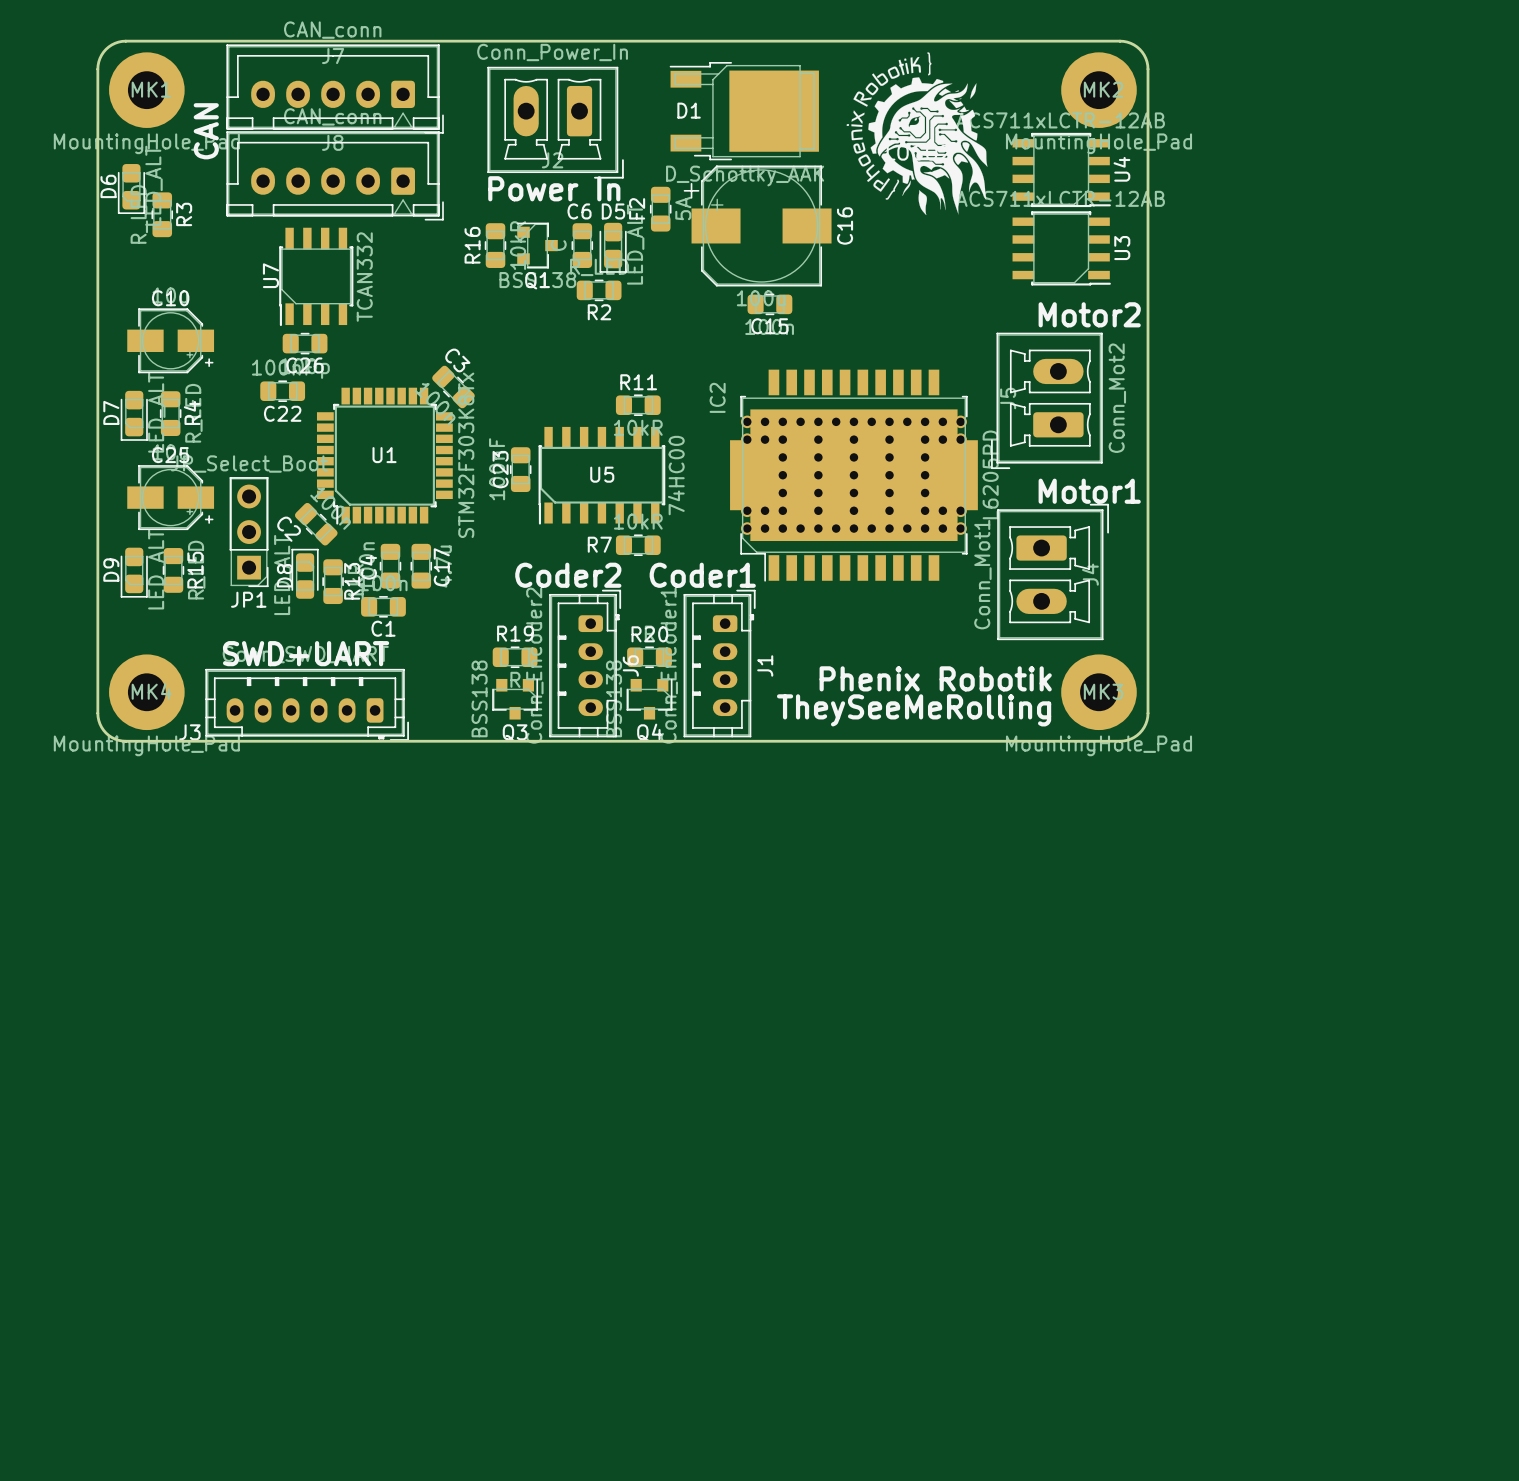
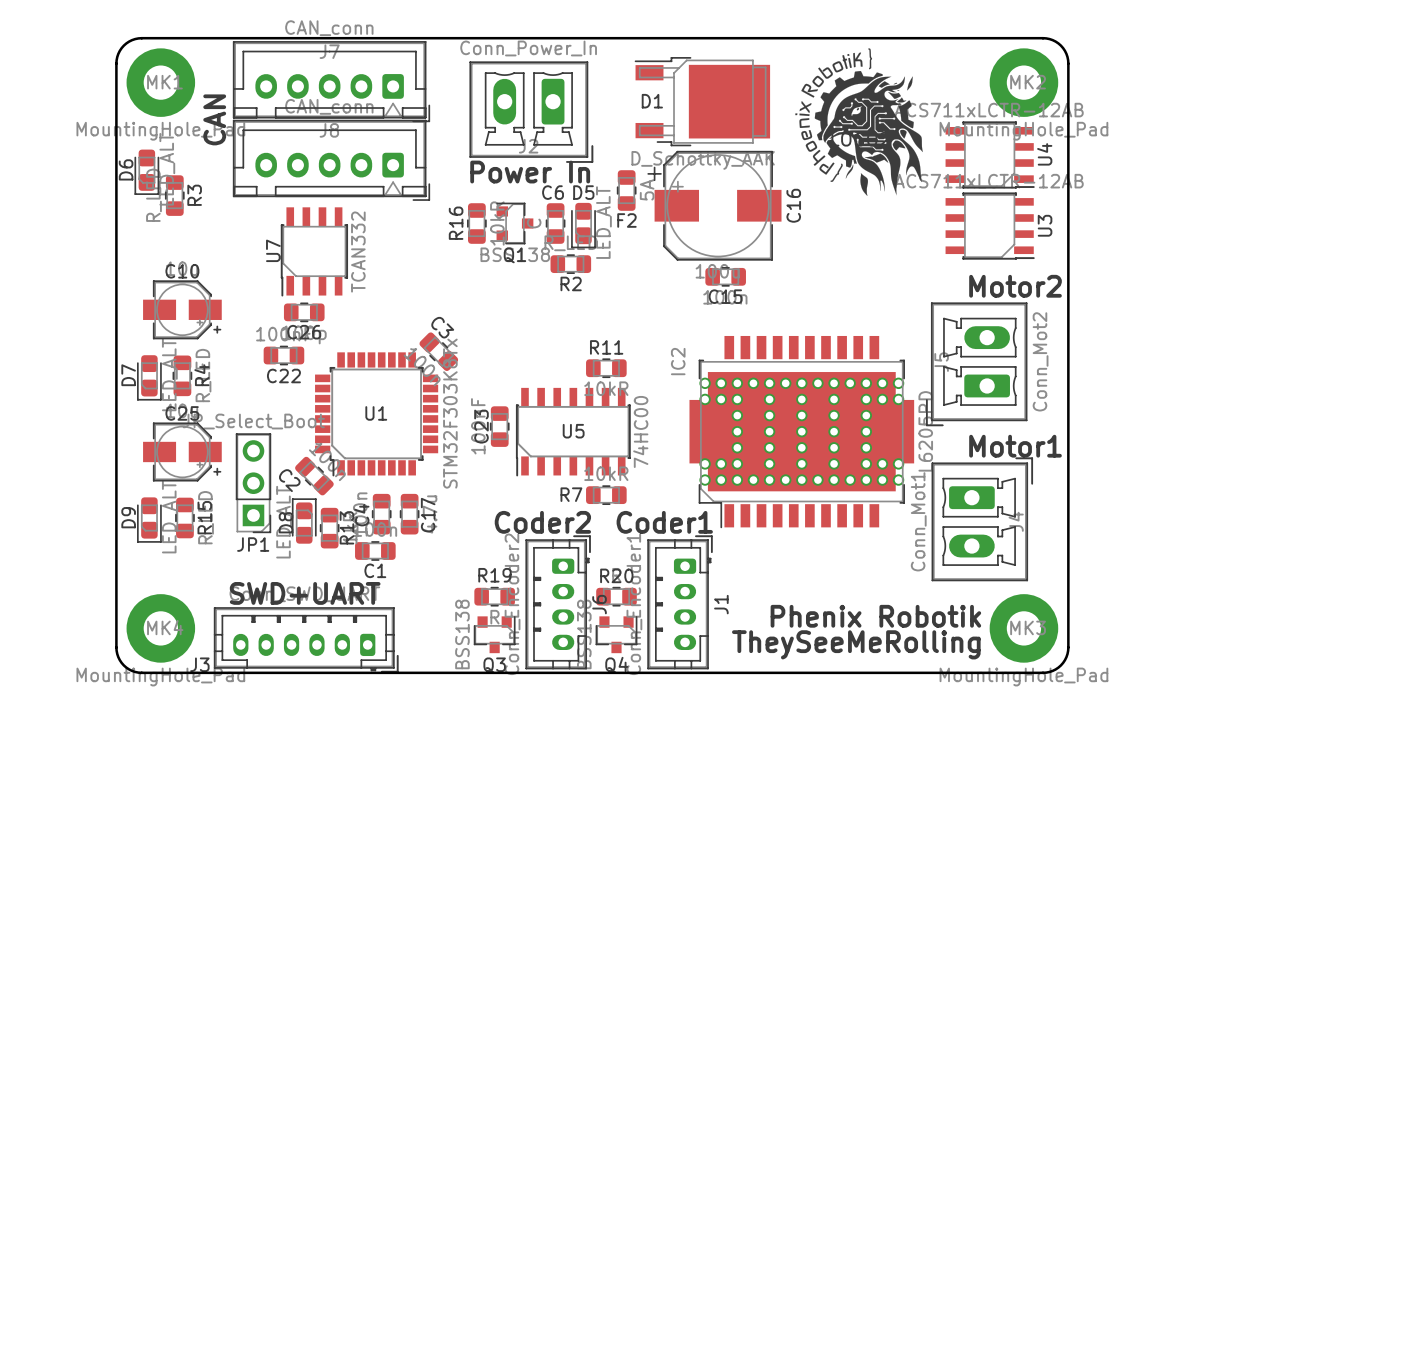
F2 name rotation: 0° (637, 208) -> 90° clockwise (626, 220)
F2 name position: F2 (637, 208) -> F2 (626, 220)

